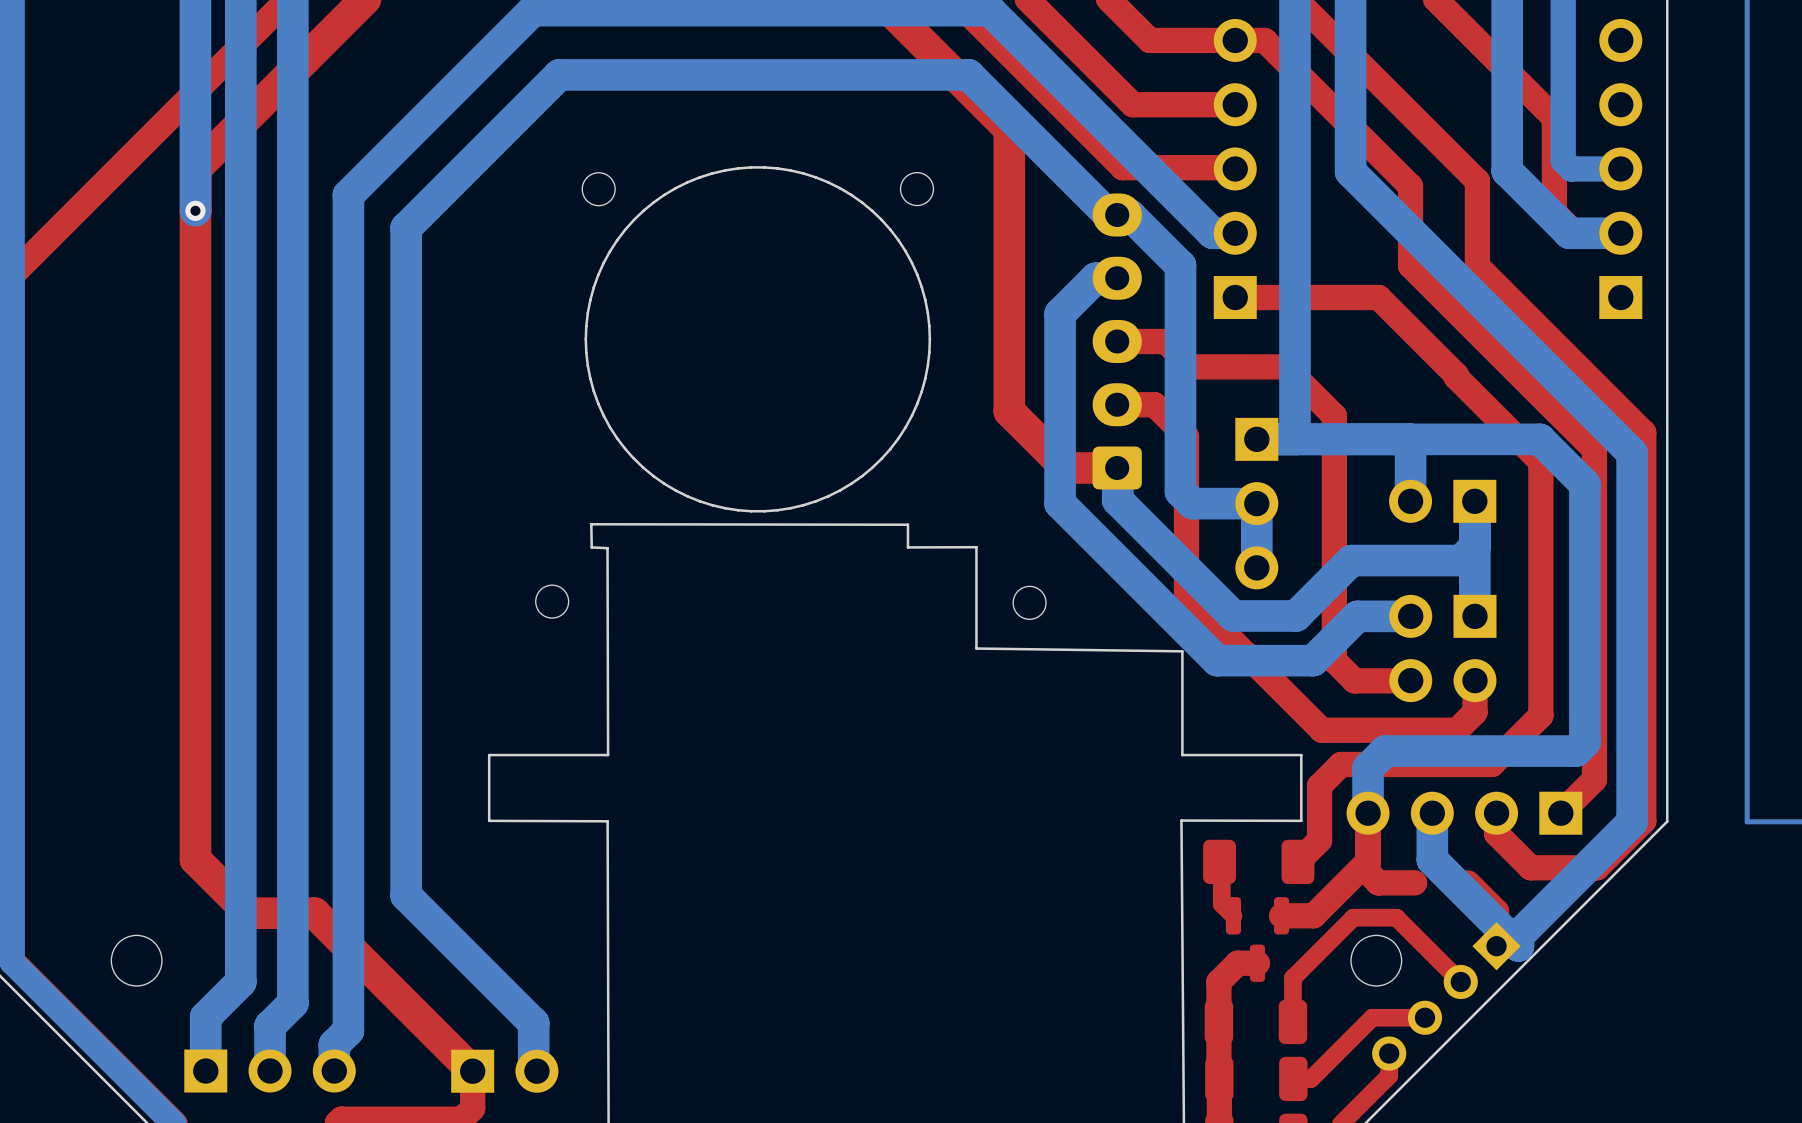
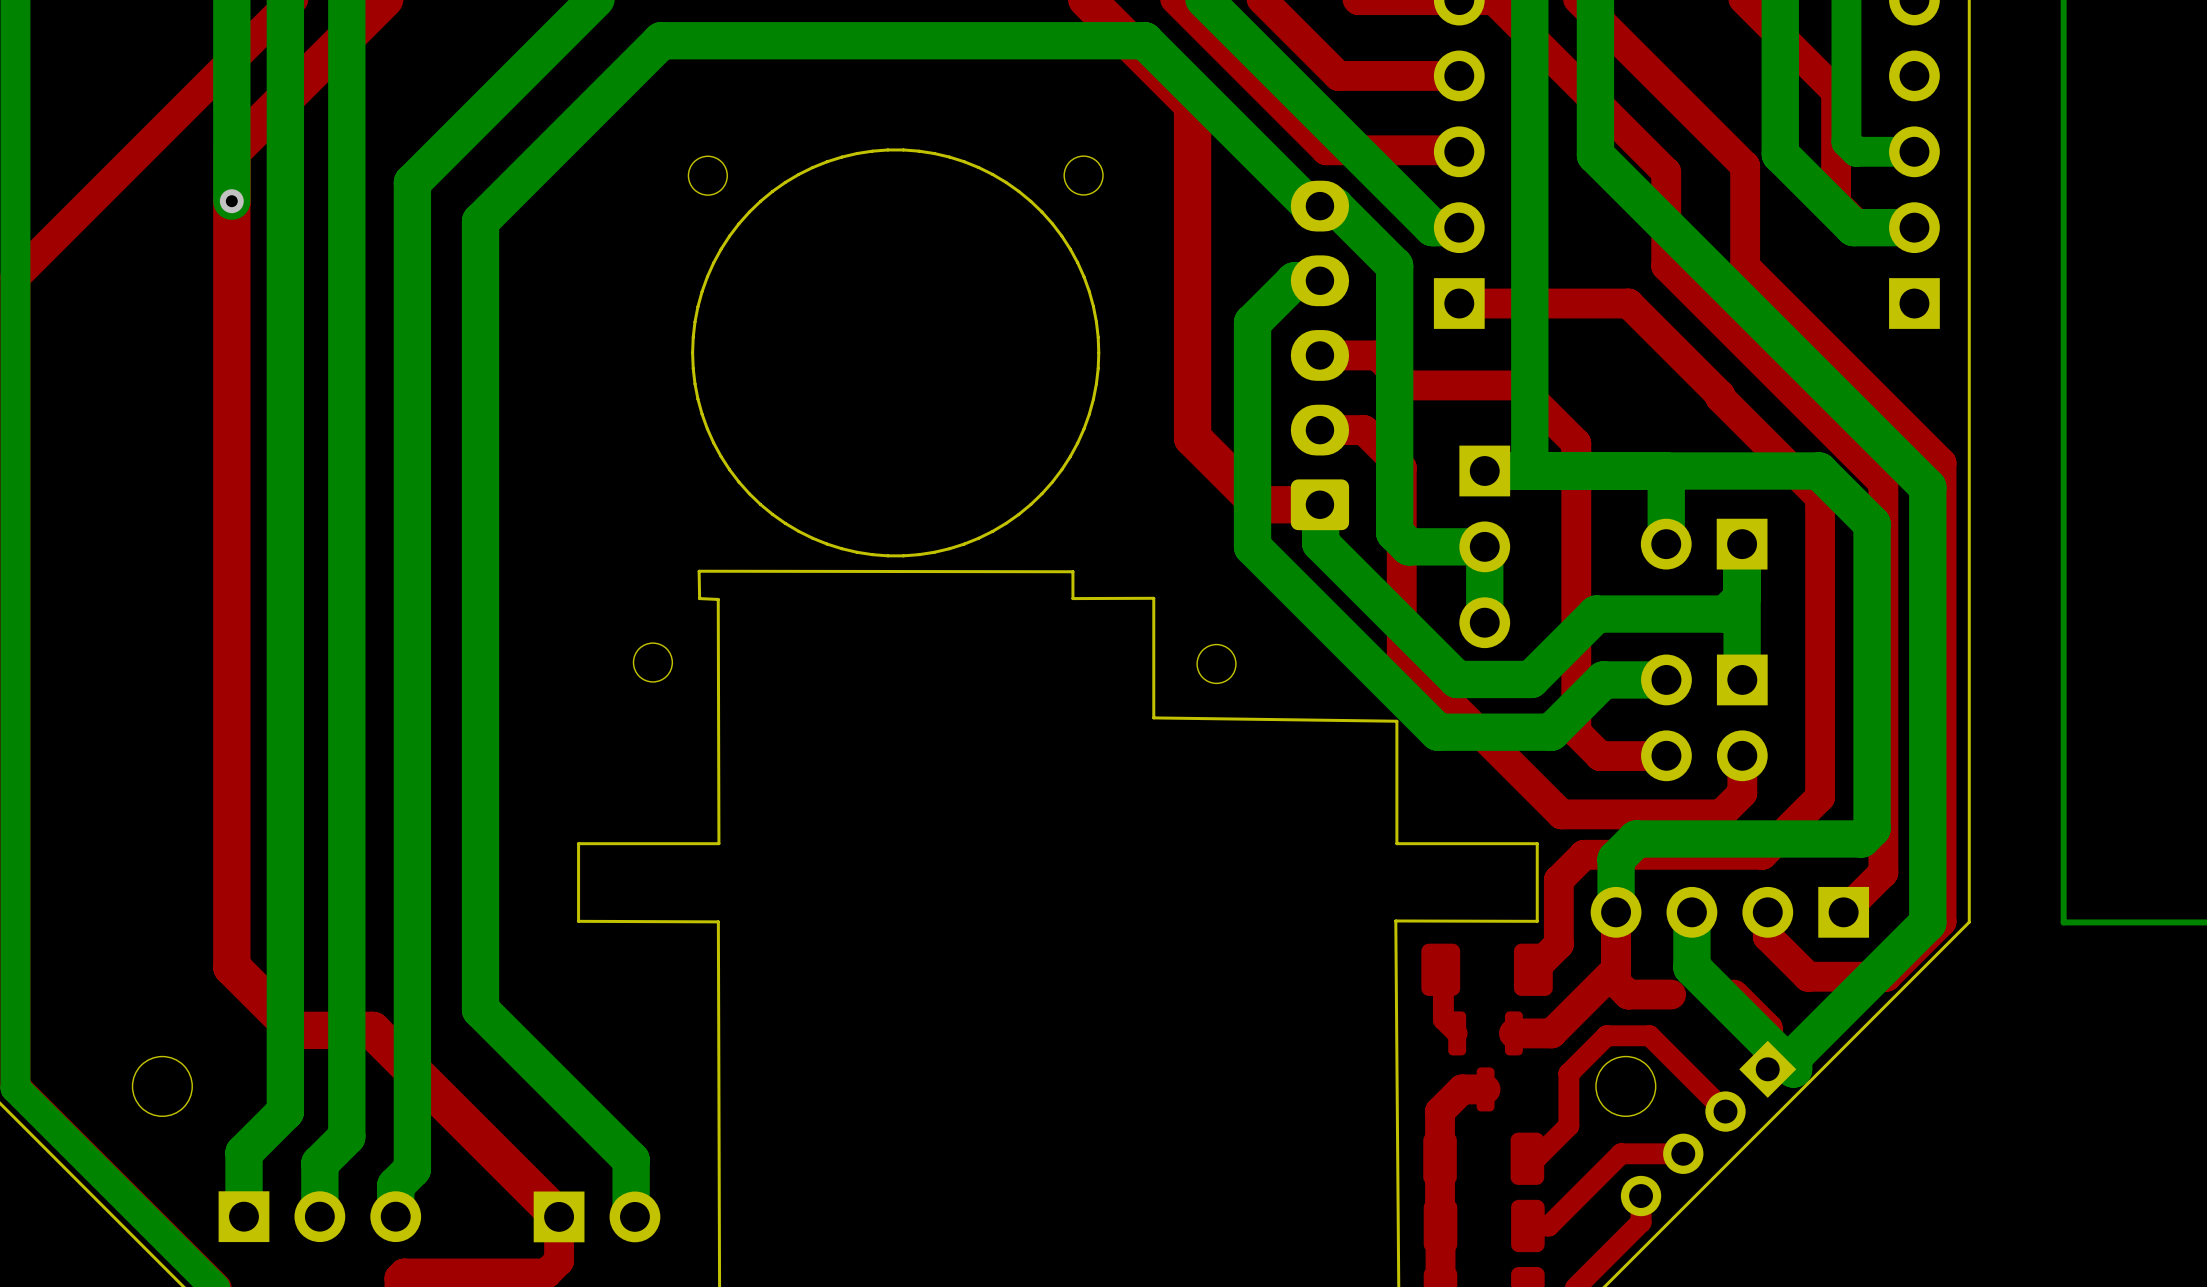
top track: (1360, 917) (1353, 917) (1292, 978) (1292, 1021) -> (1606, 1035) (1568, 1073) (1568, 1125) (1535, 1158) (1527, 1158)

